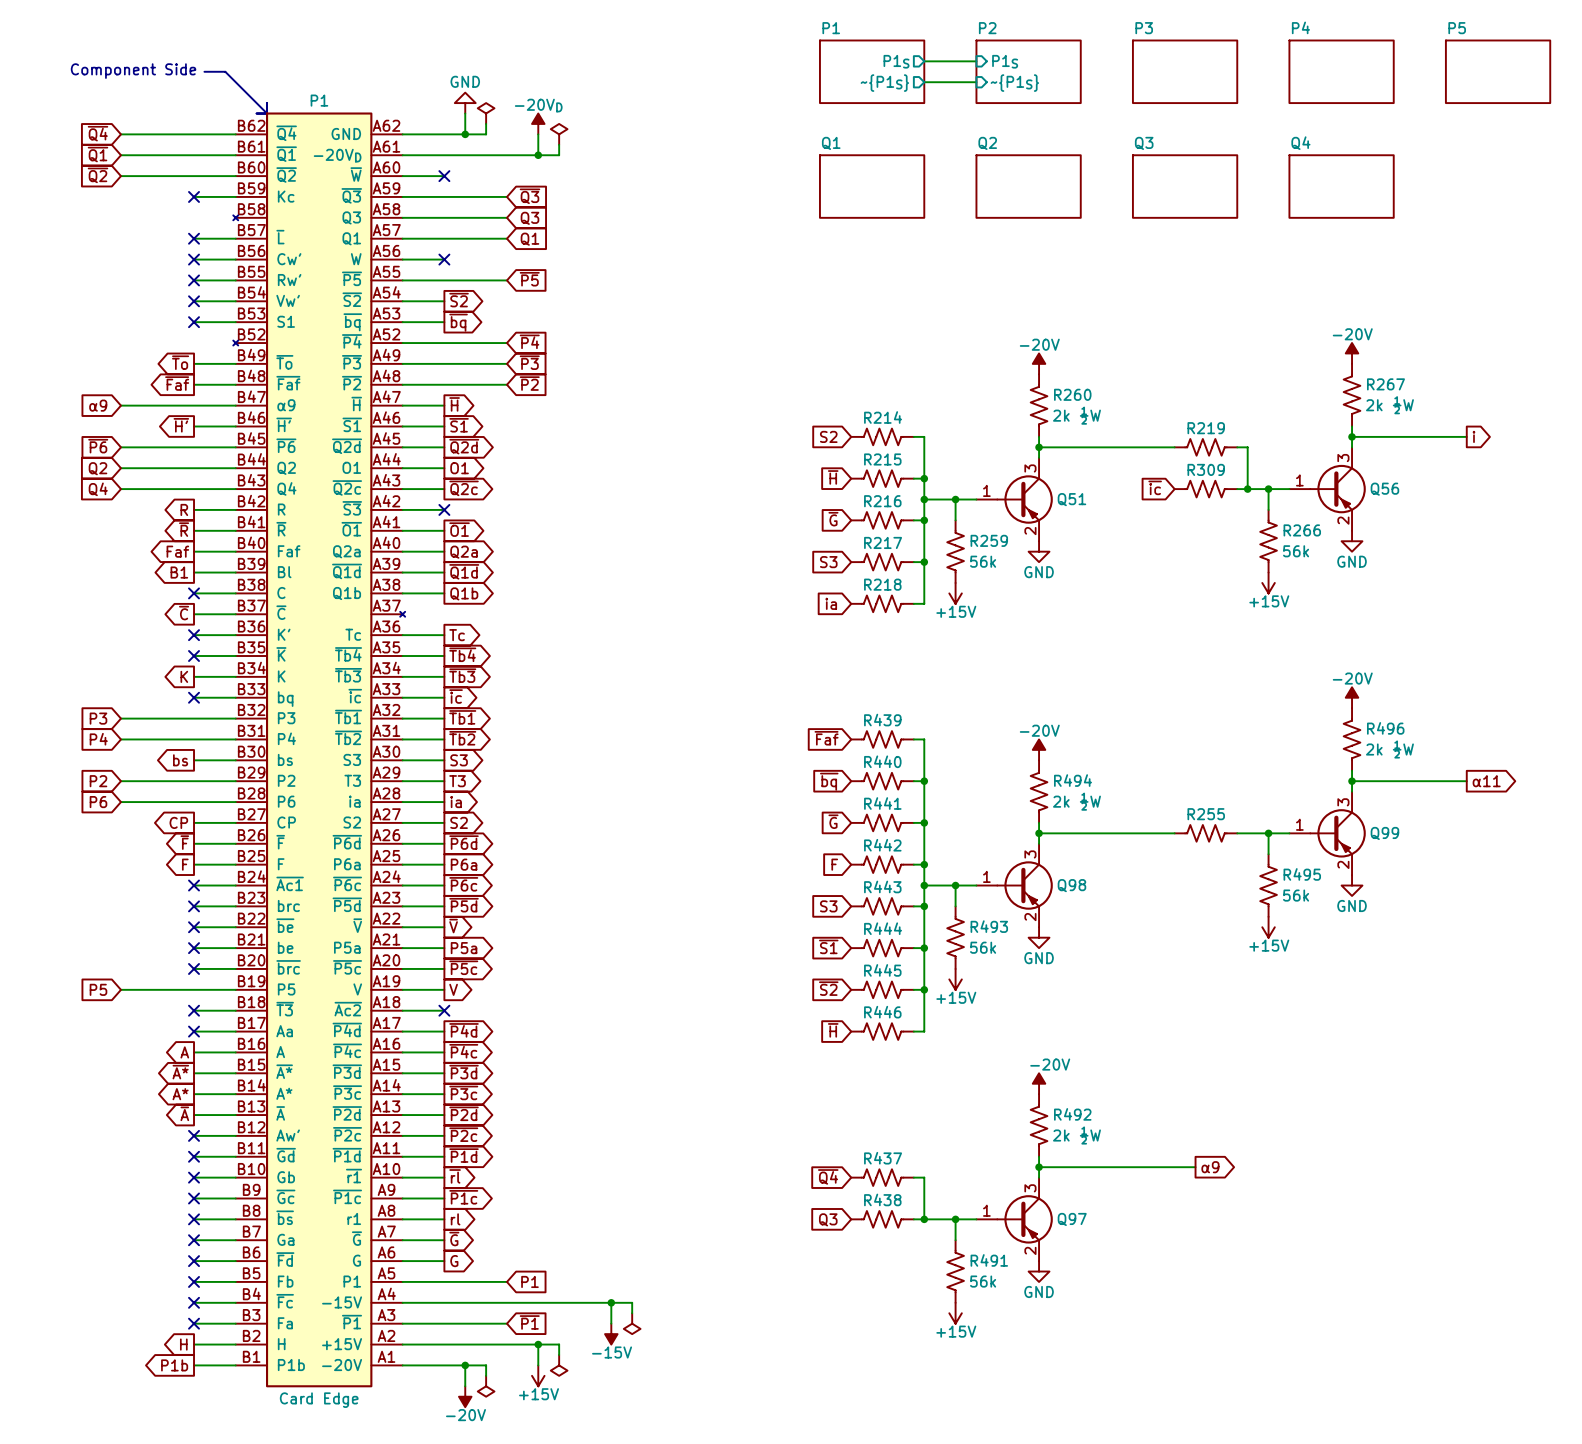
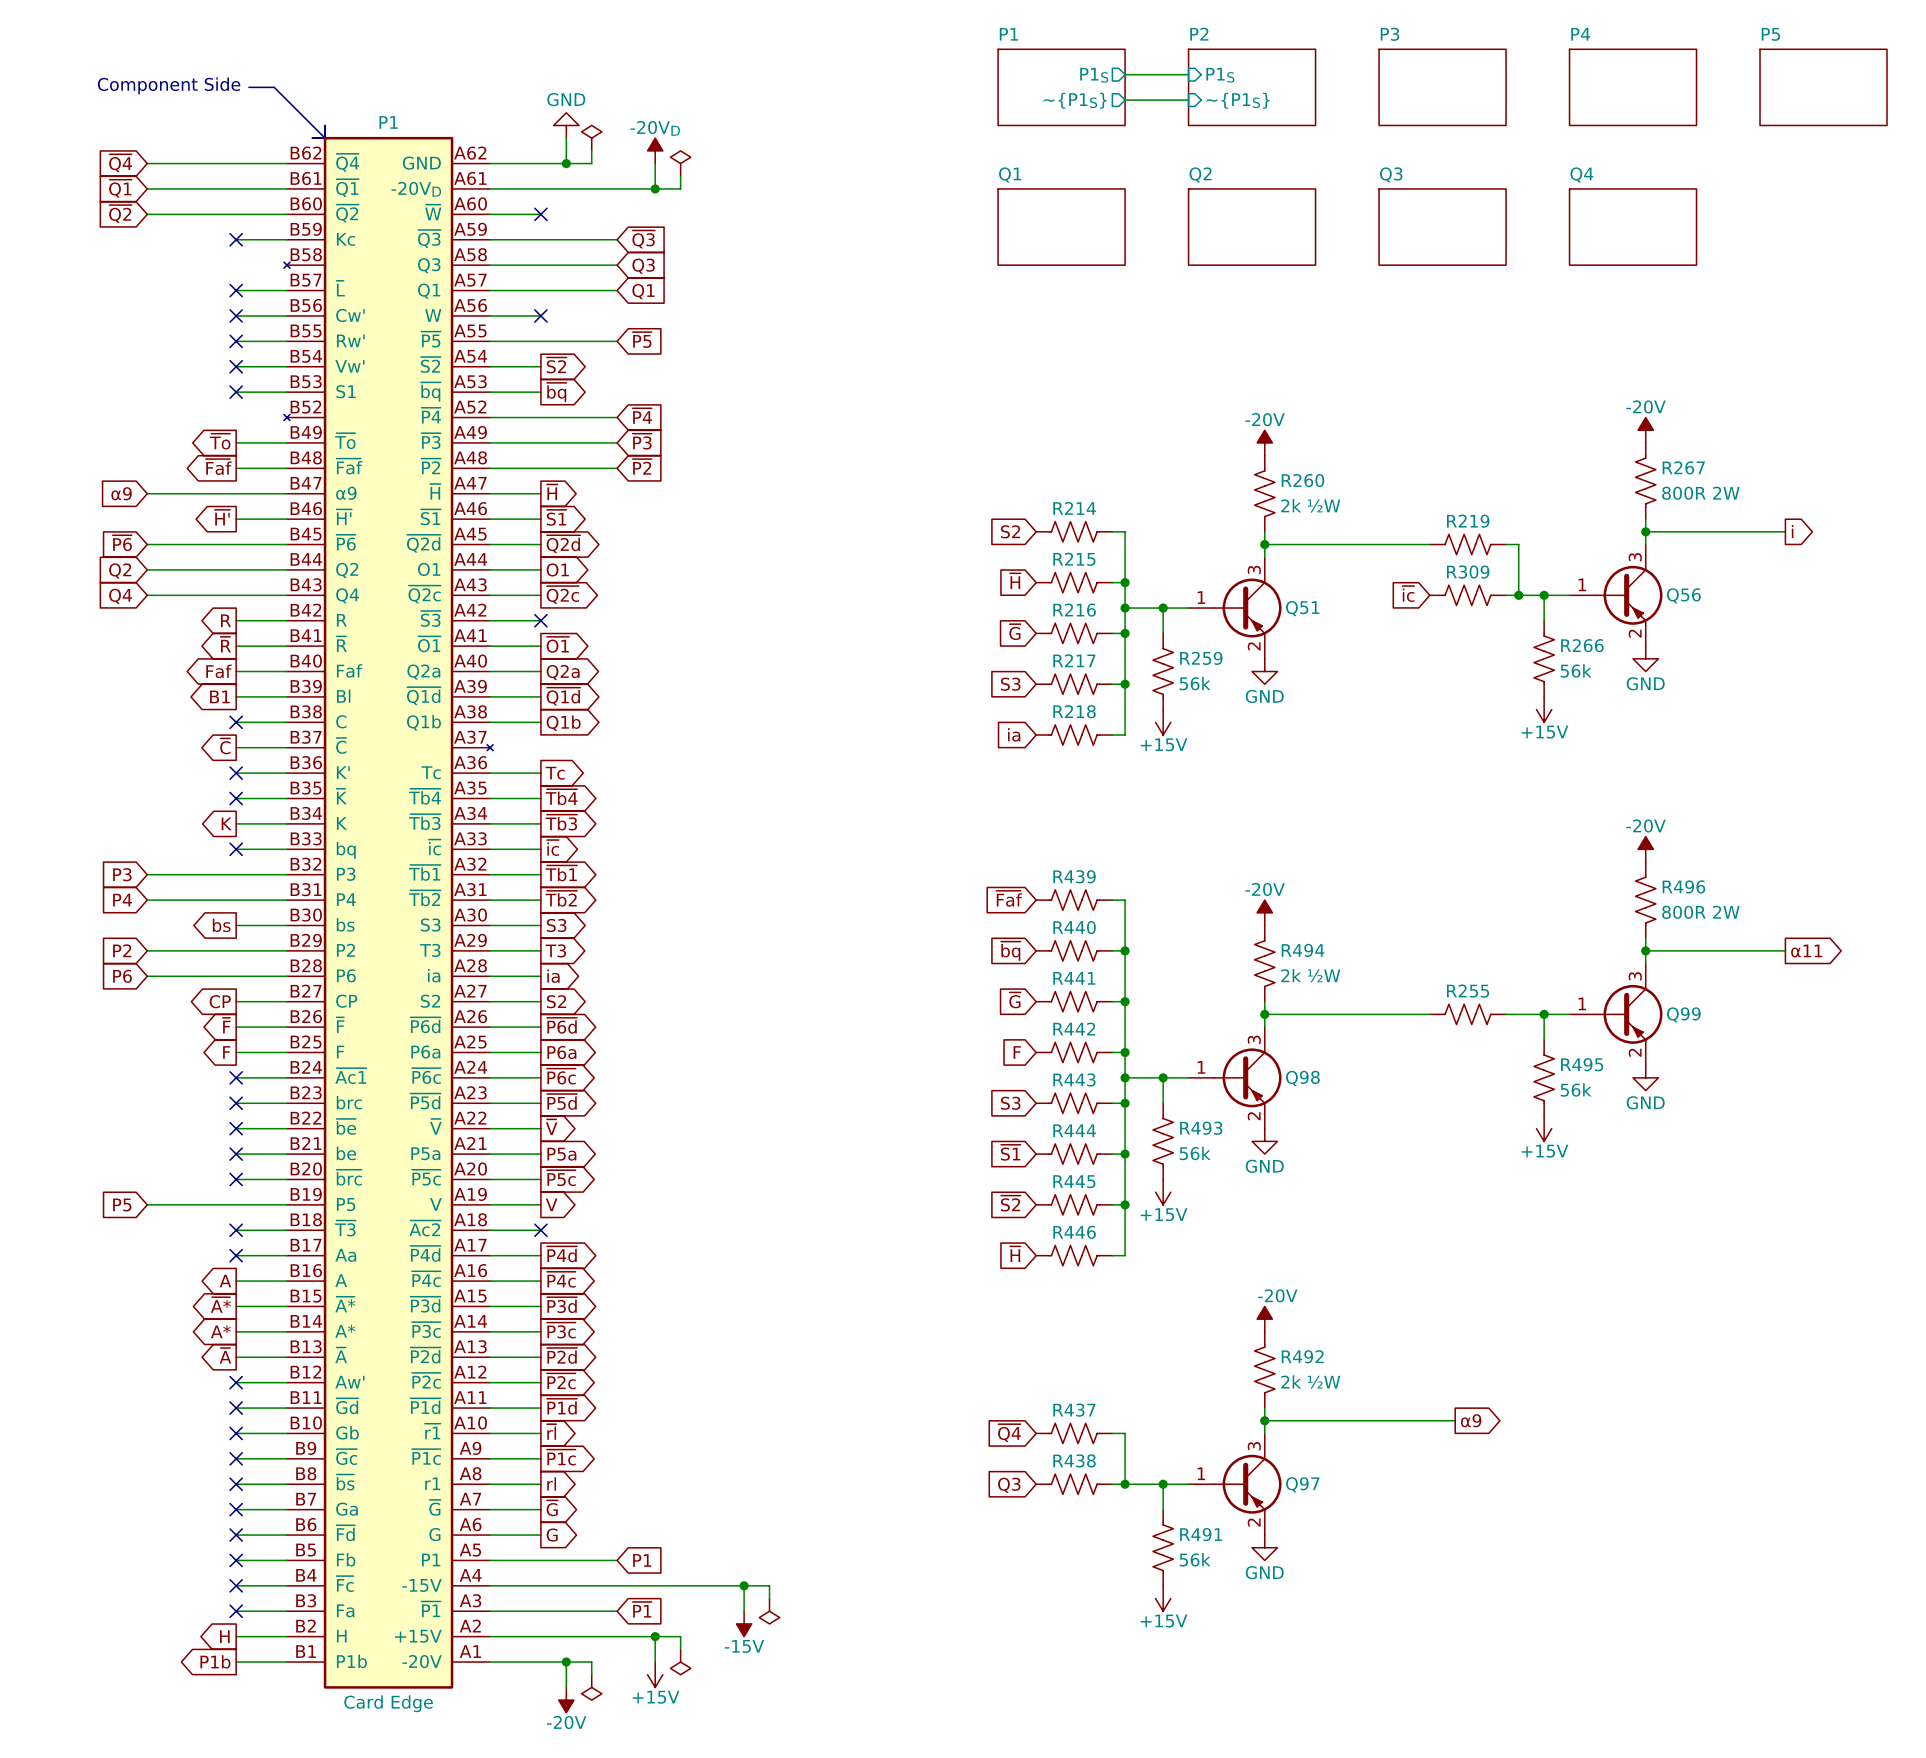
R267 value: 2k ½W (1389, 405) -> 800R 2W (1700, 493)
R496 value: 2k ½W (1389, 749) -> 800R 2W (1700, 912)

